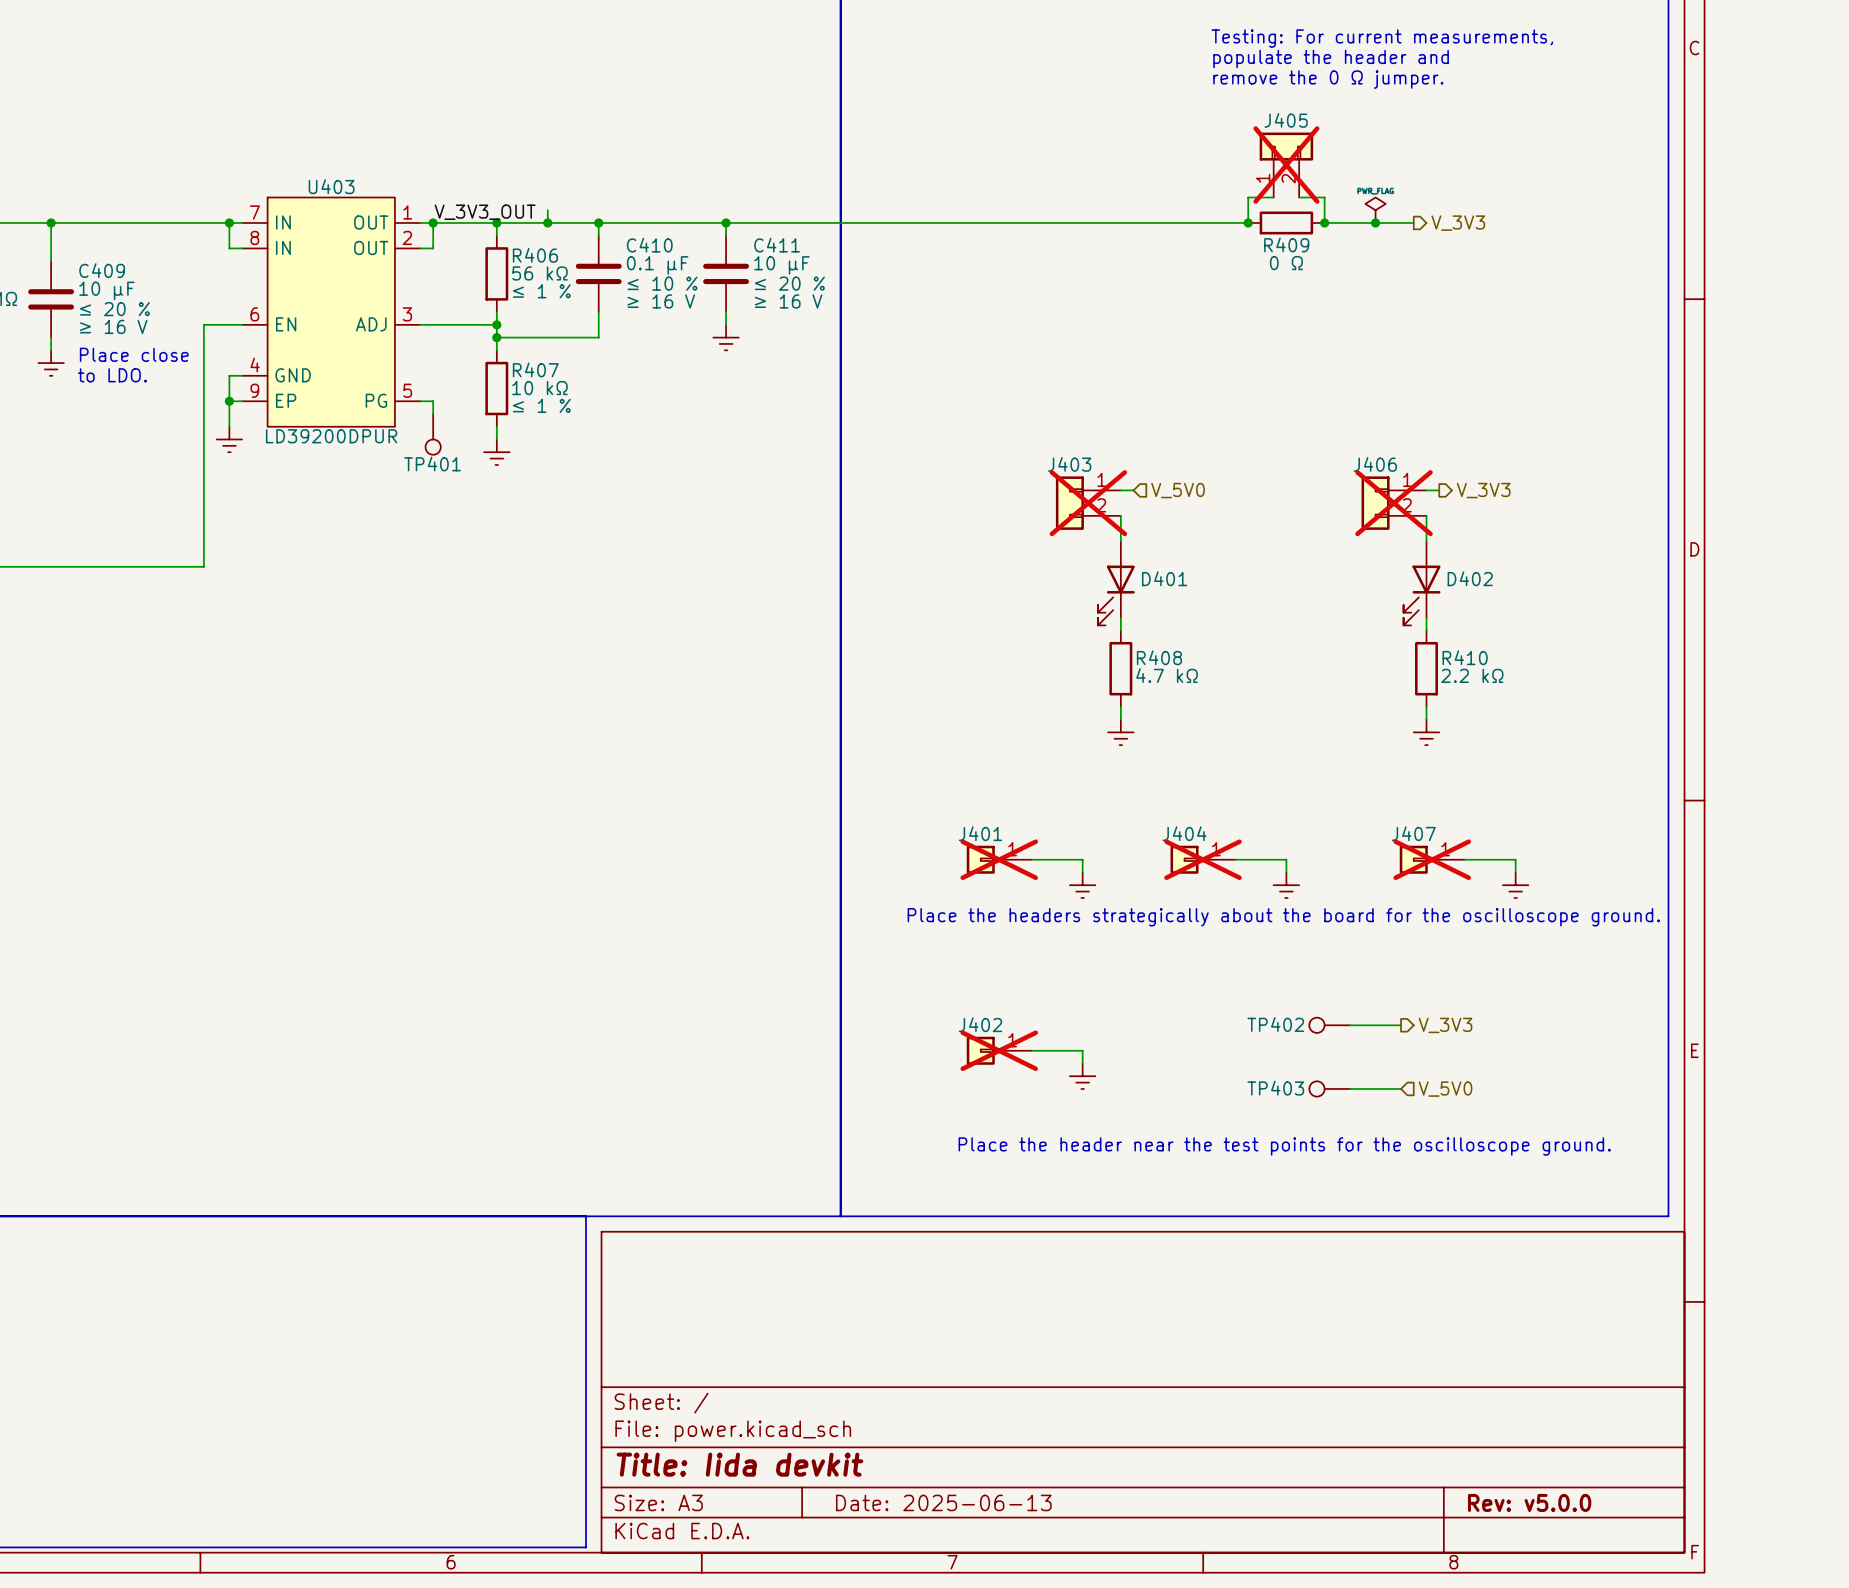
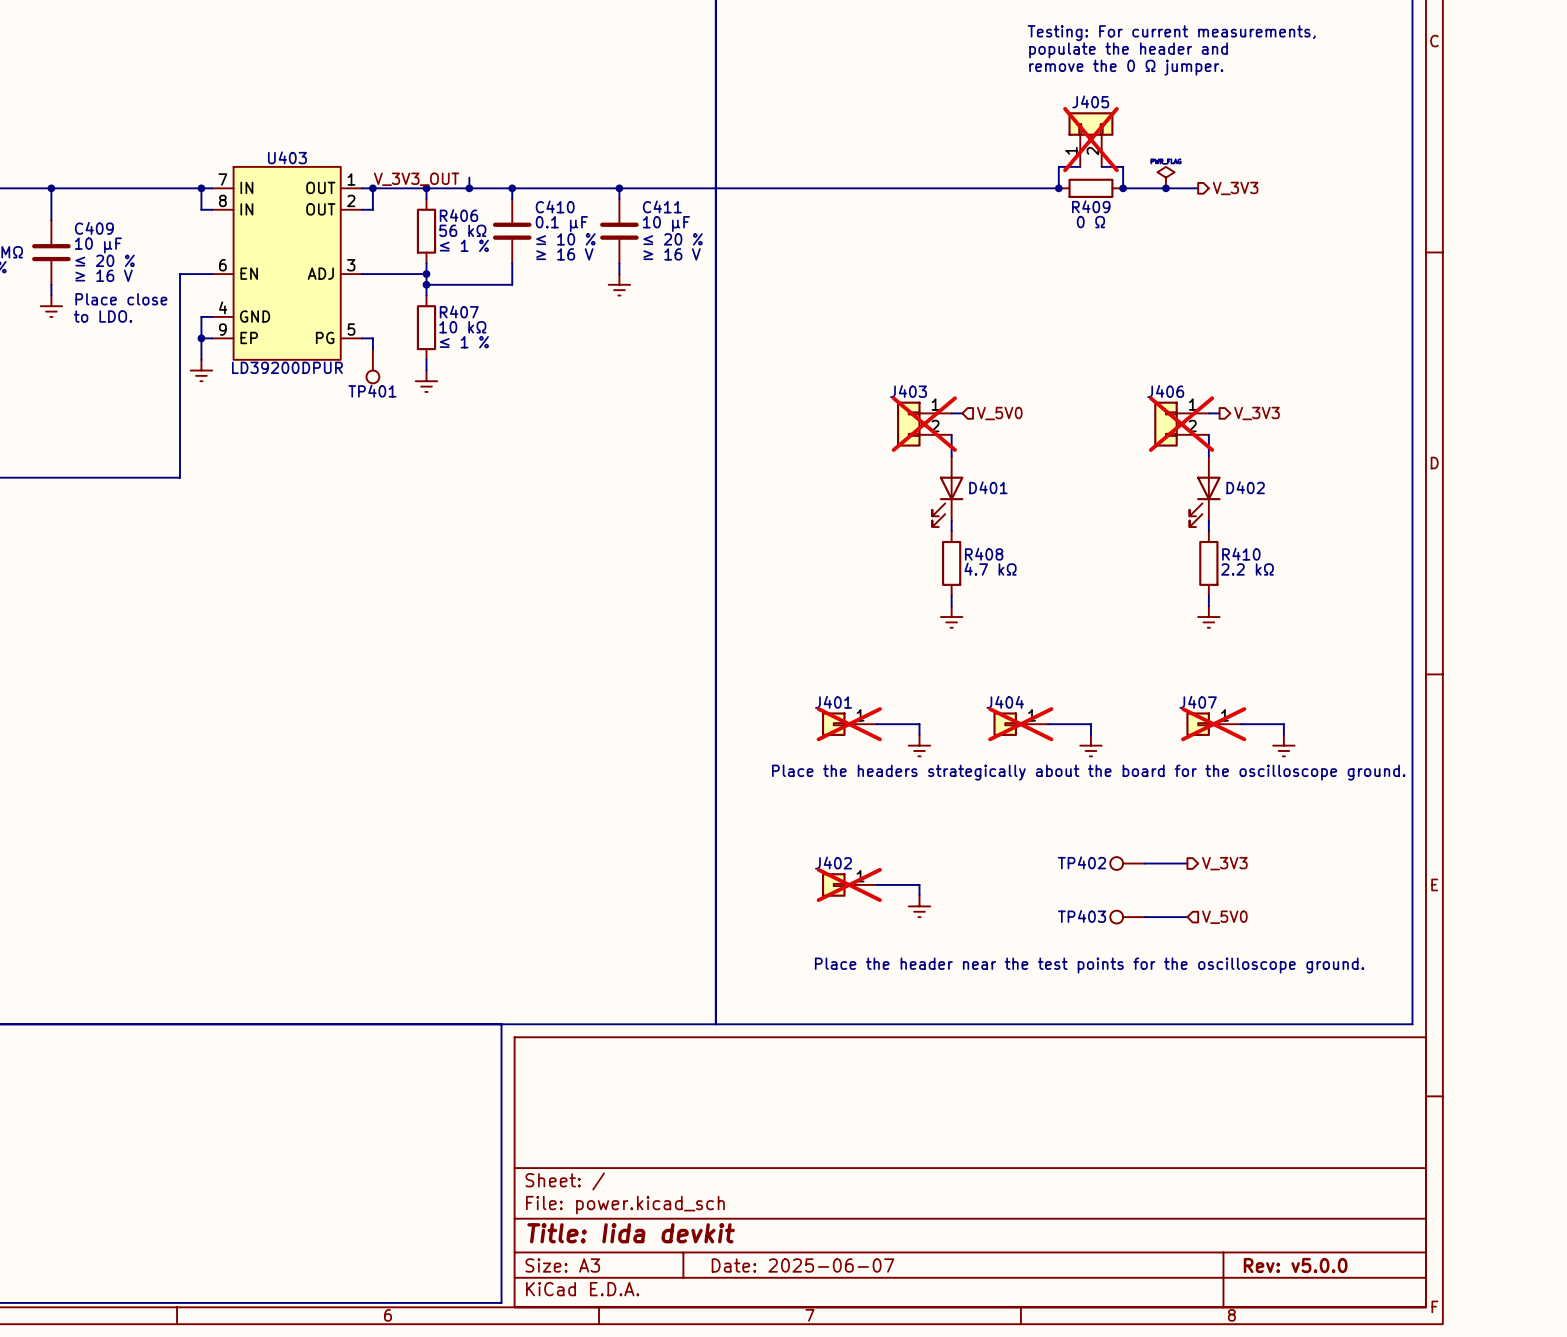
title block: Date: 2025-06-13 (943, 1502) -> Date: 2025-06-07 (802, 1265)

